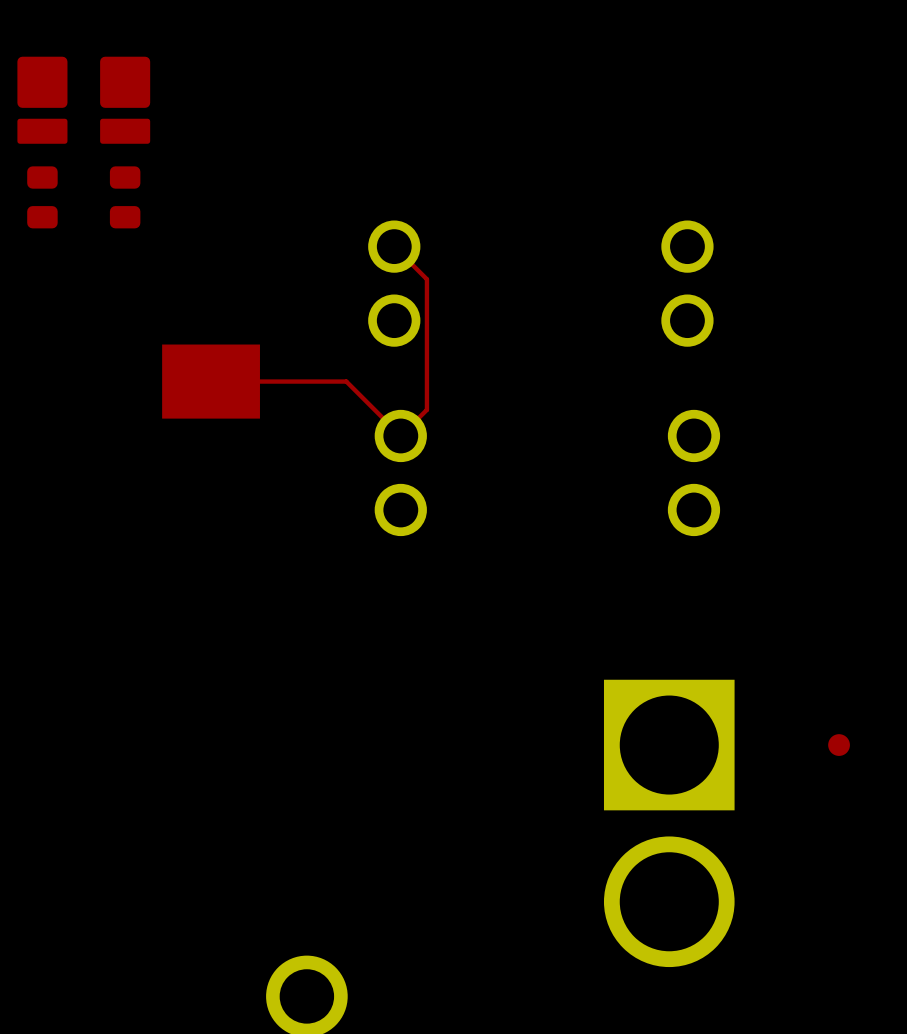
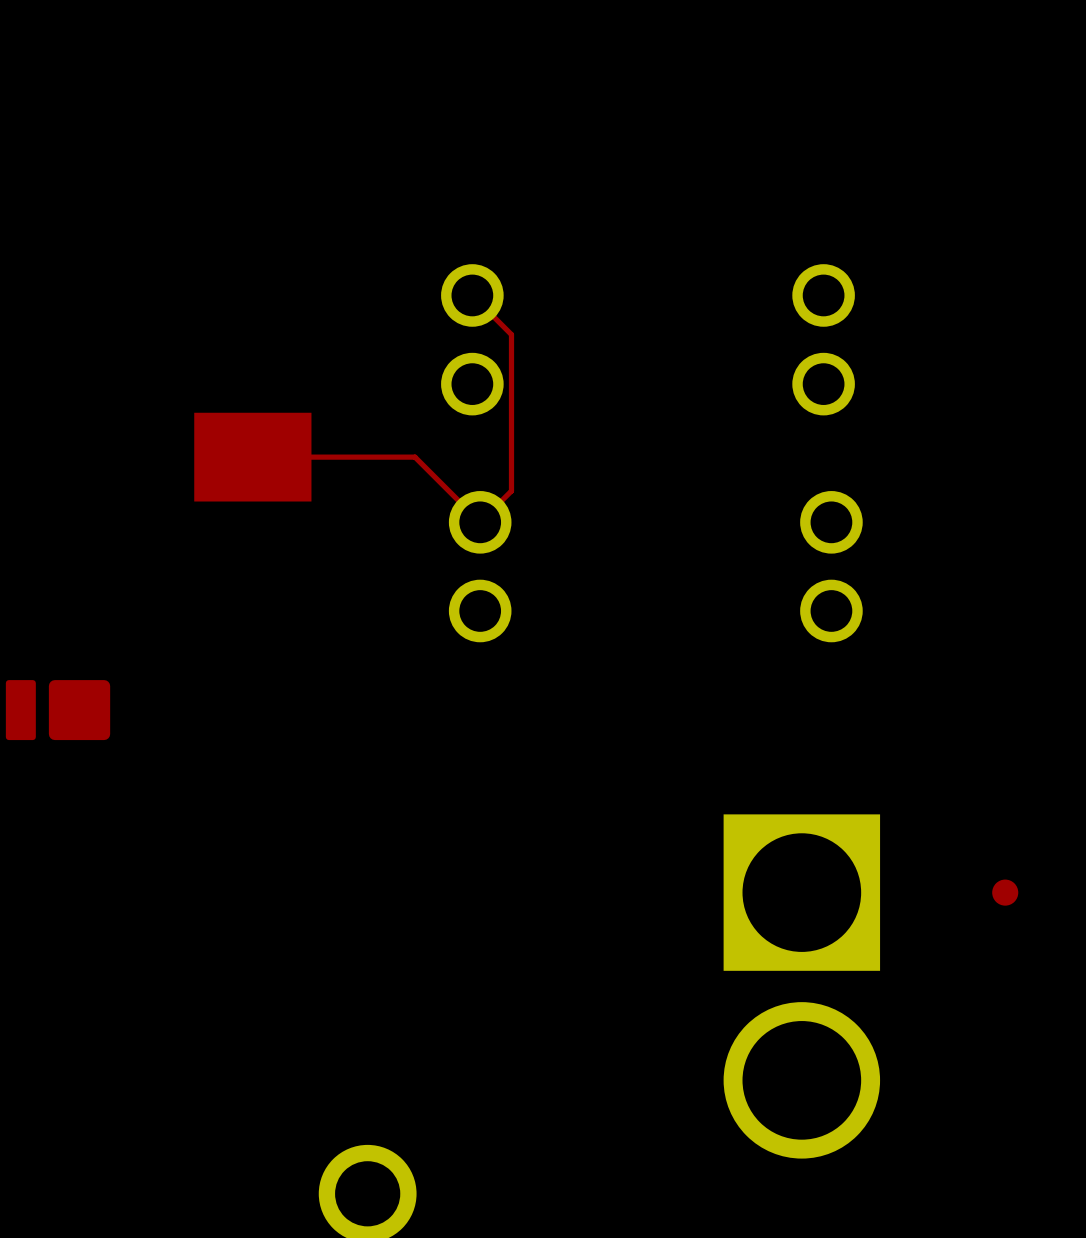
part: (42, 100) -> none
part: (125, 100) -> none
part: (42, 197) -> none
part: (125, 197) -> none
part: none -> (58, 710)

